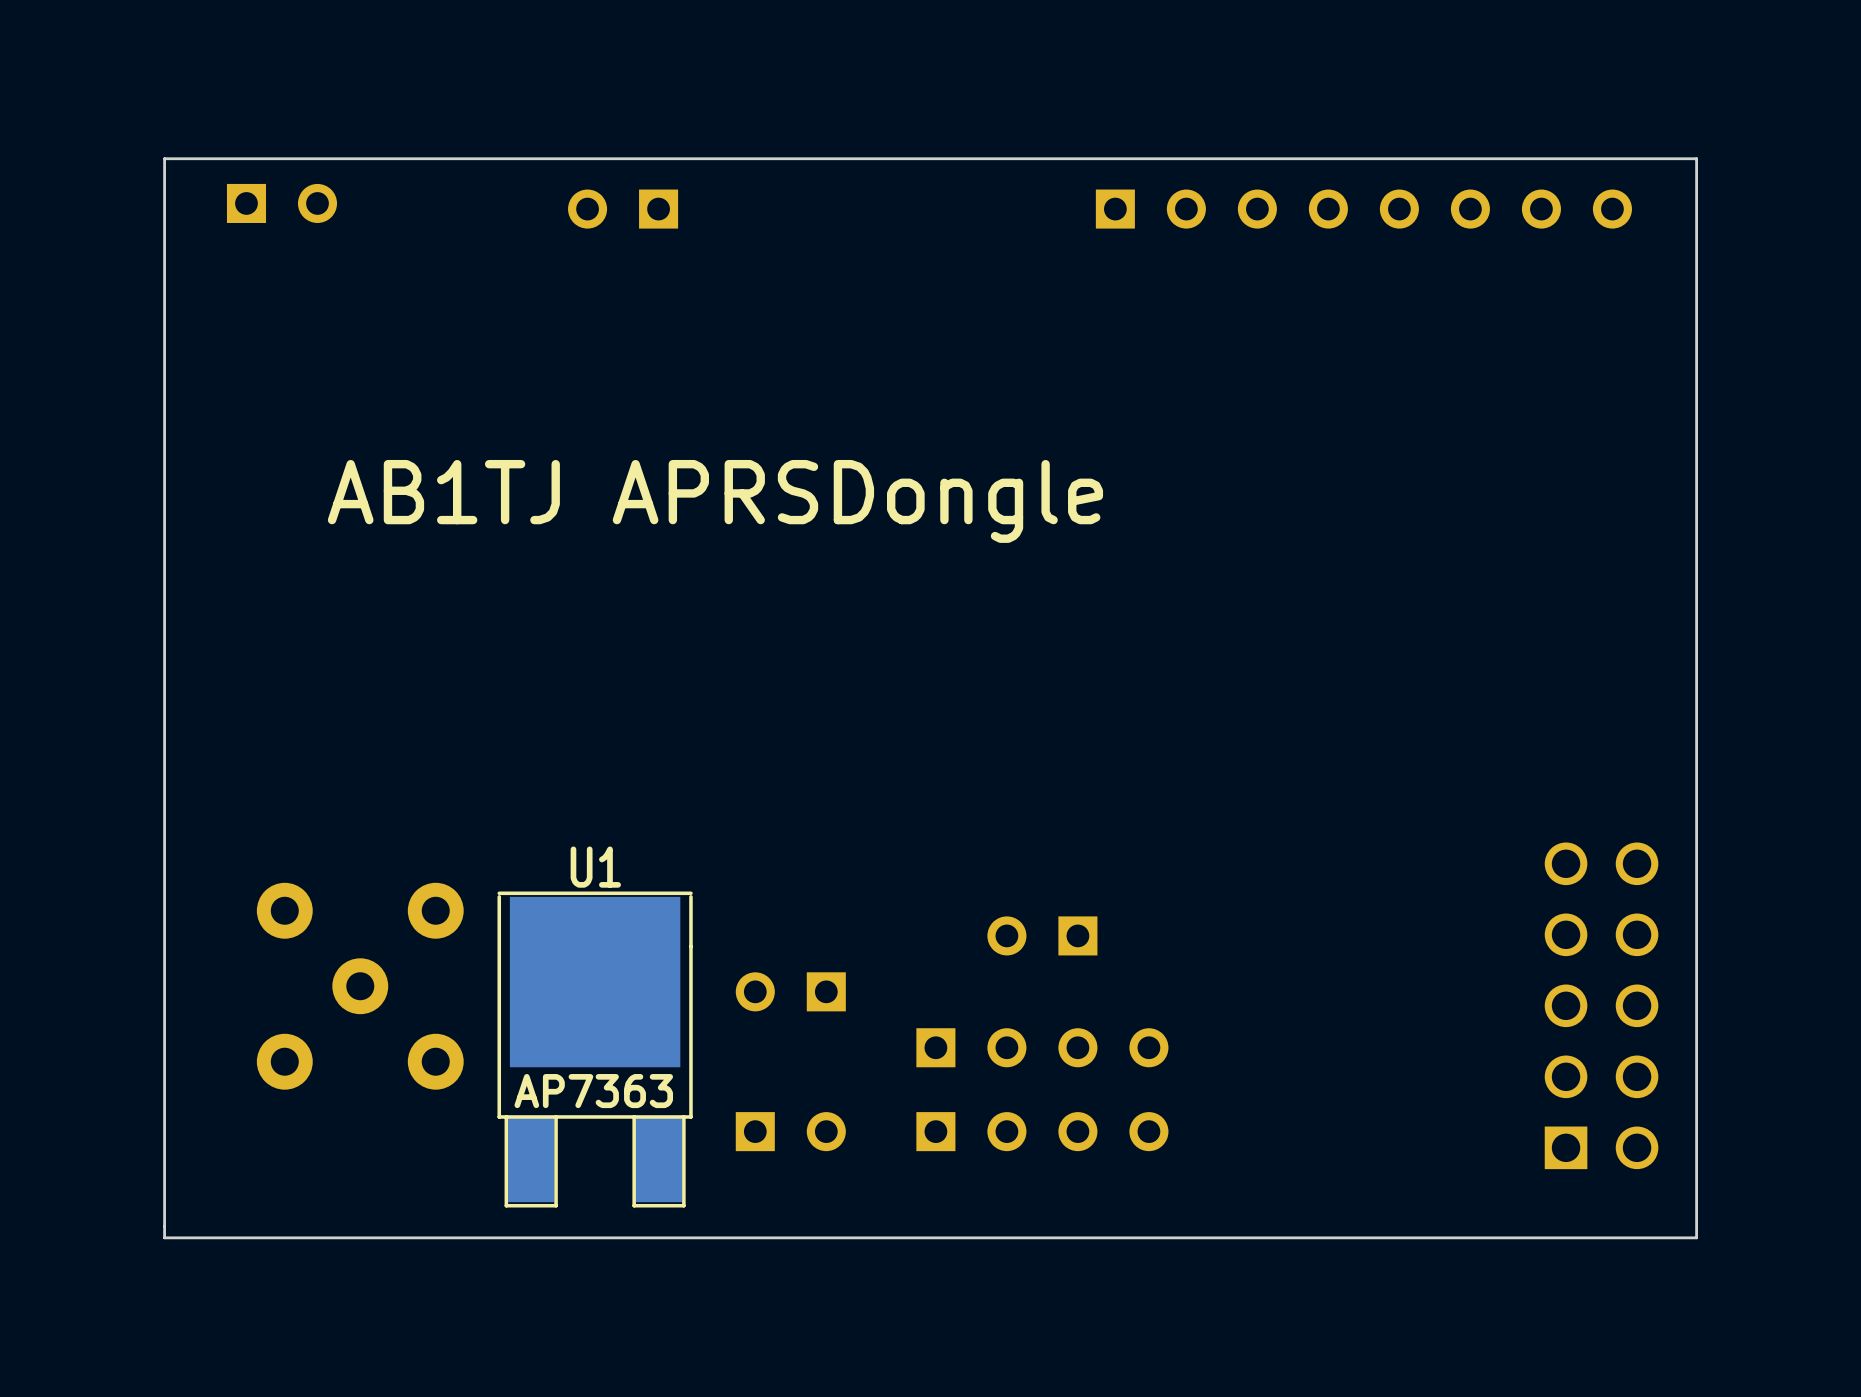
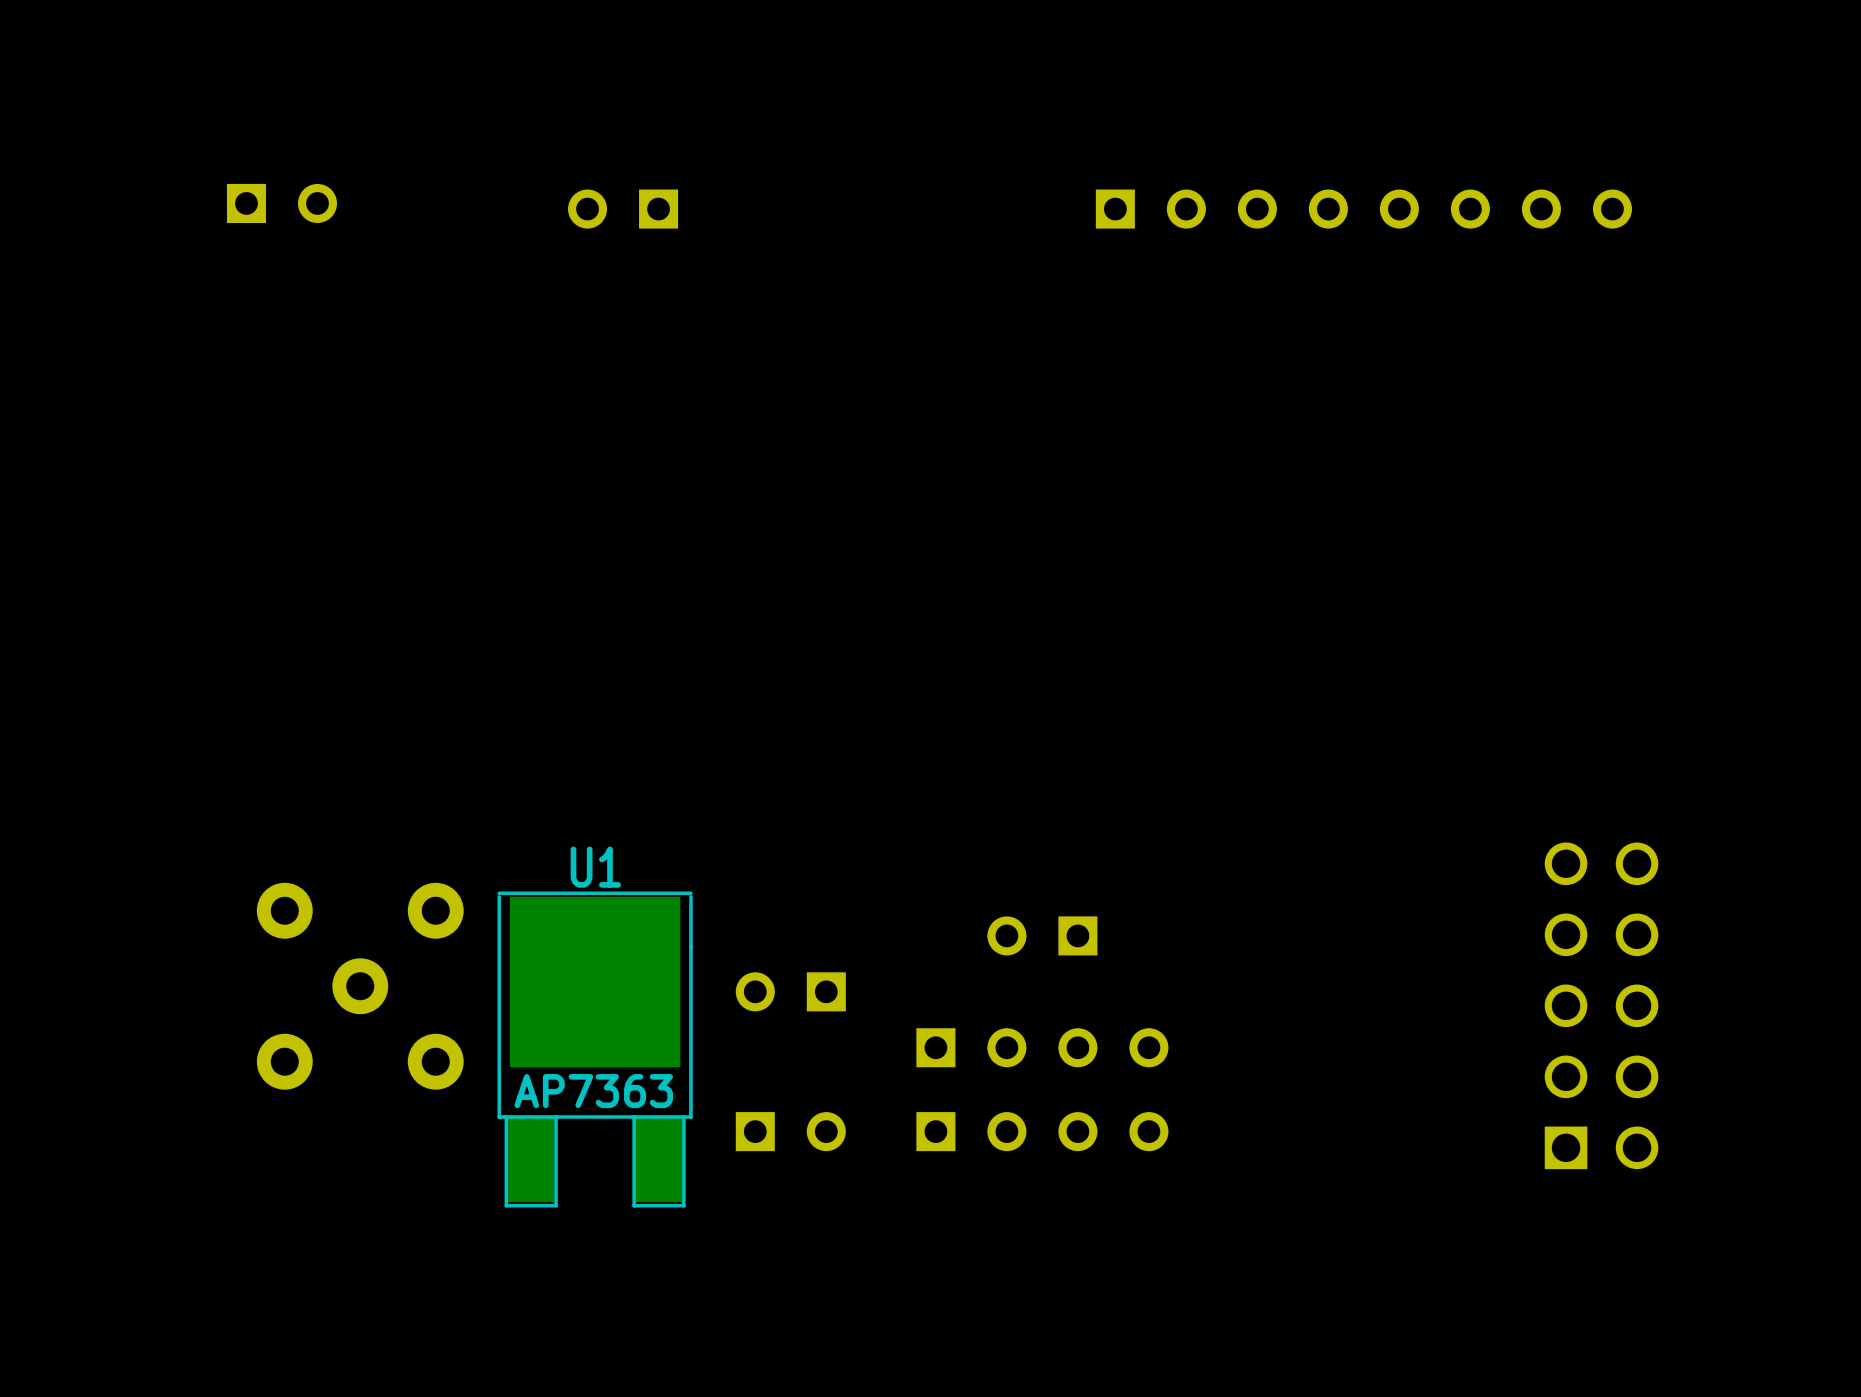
board edge: (1696, 158) (1696, 1237) (164, 1237) (164, 158) (1696, 158) -> none
text: AB1TJ APRSDongle (715, 501) -> none

